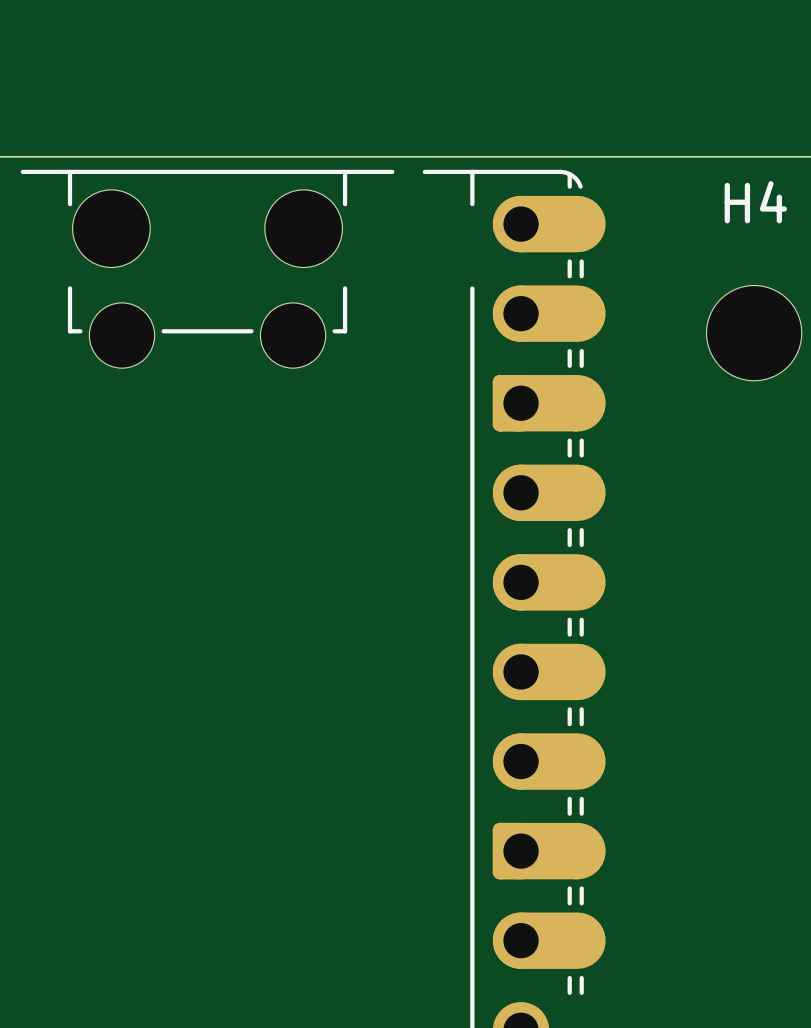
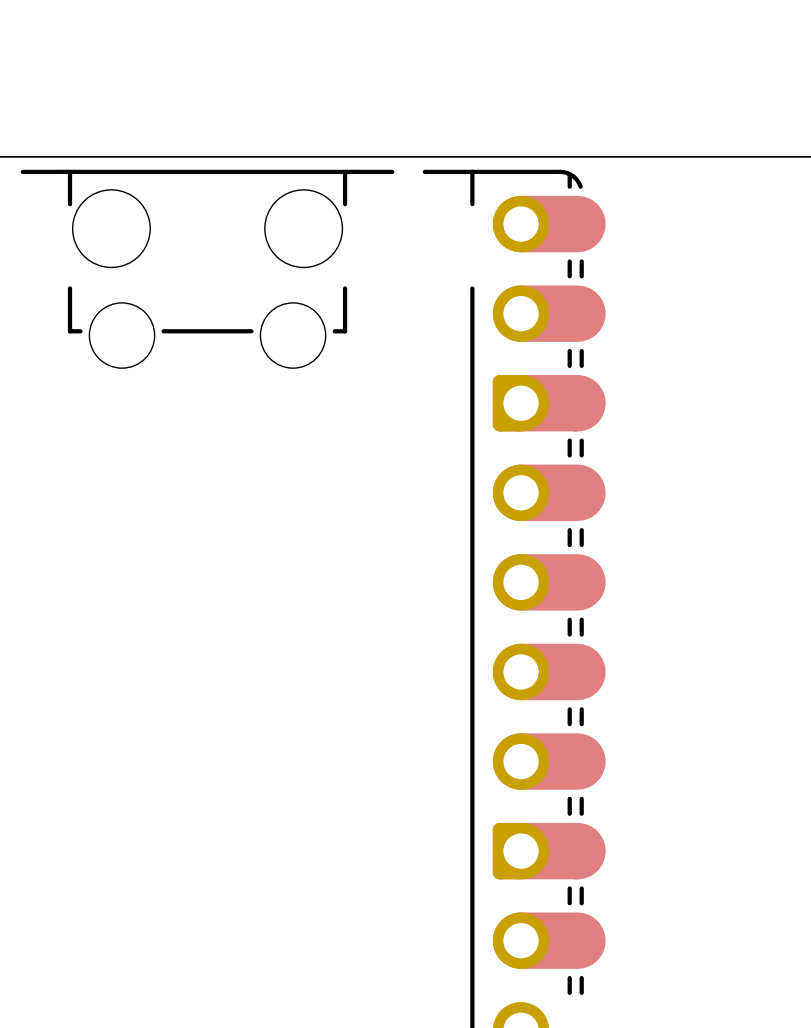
H4: (754, 333) -> none

